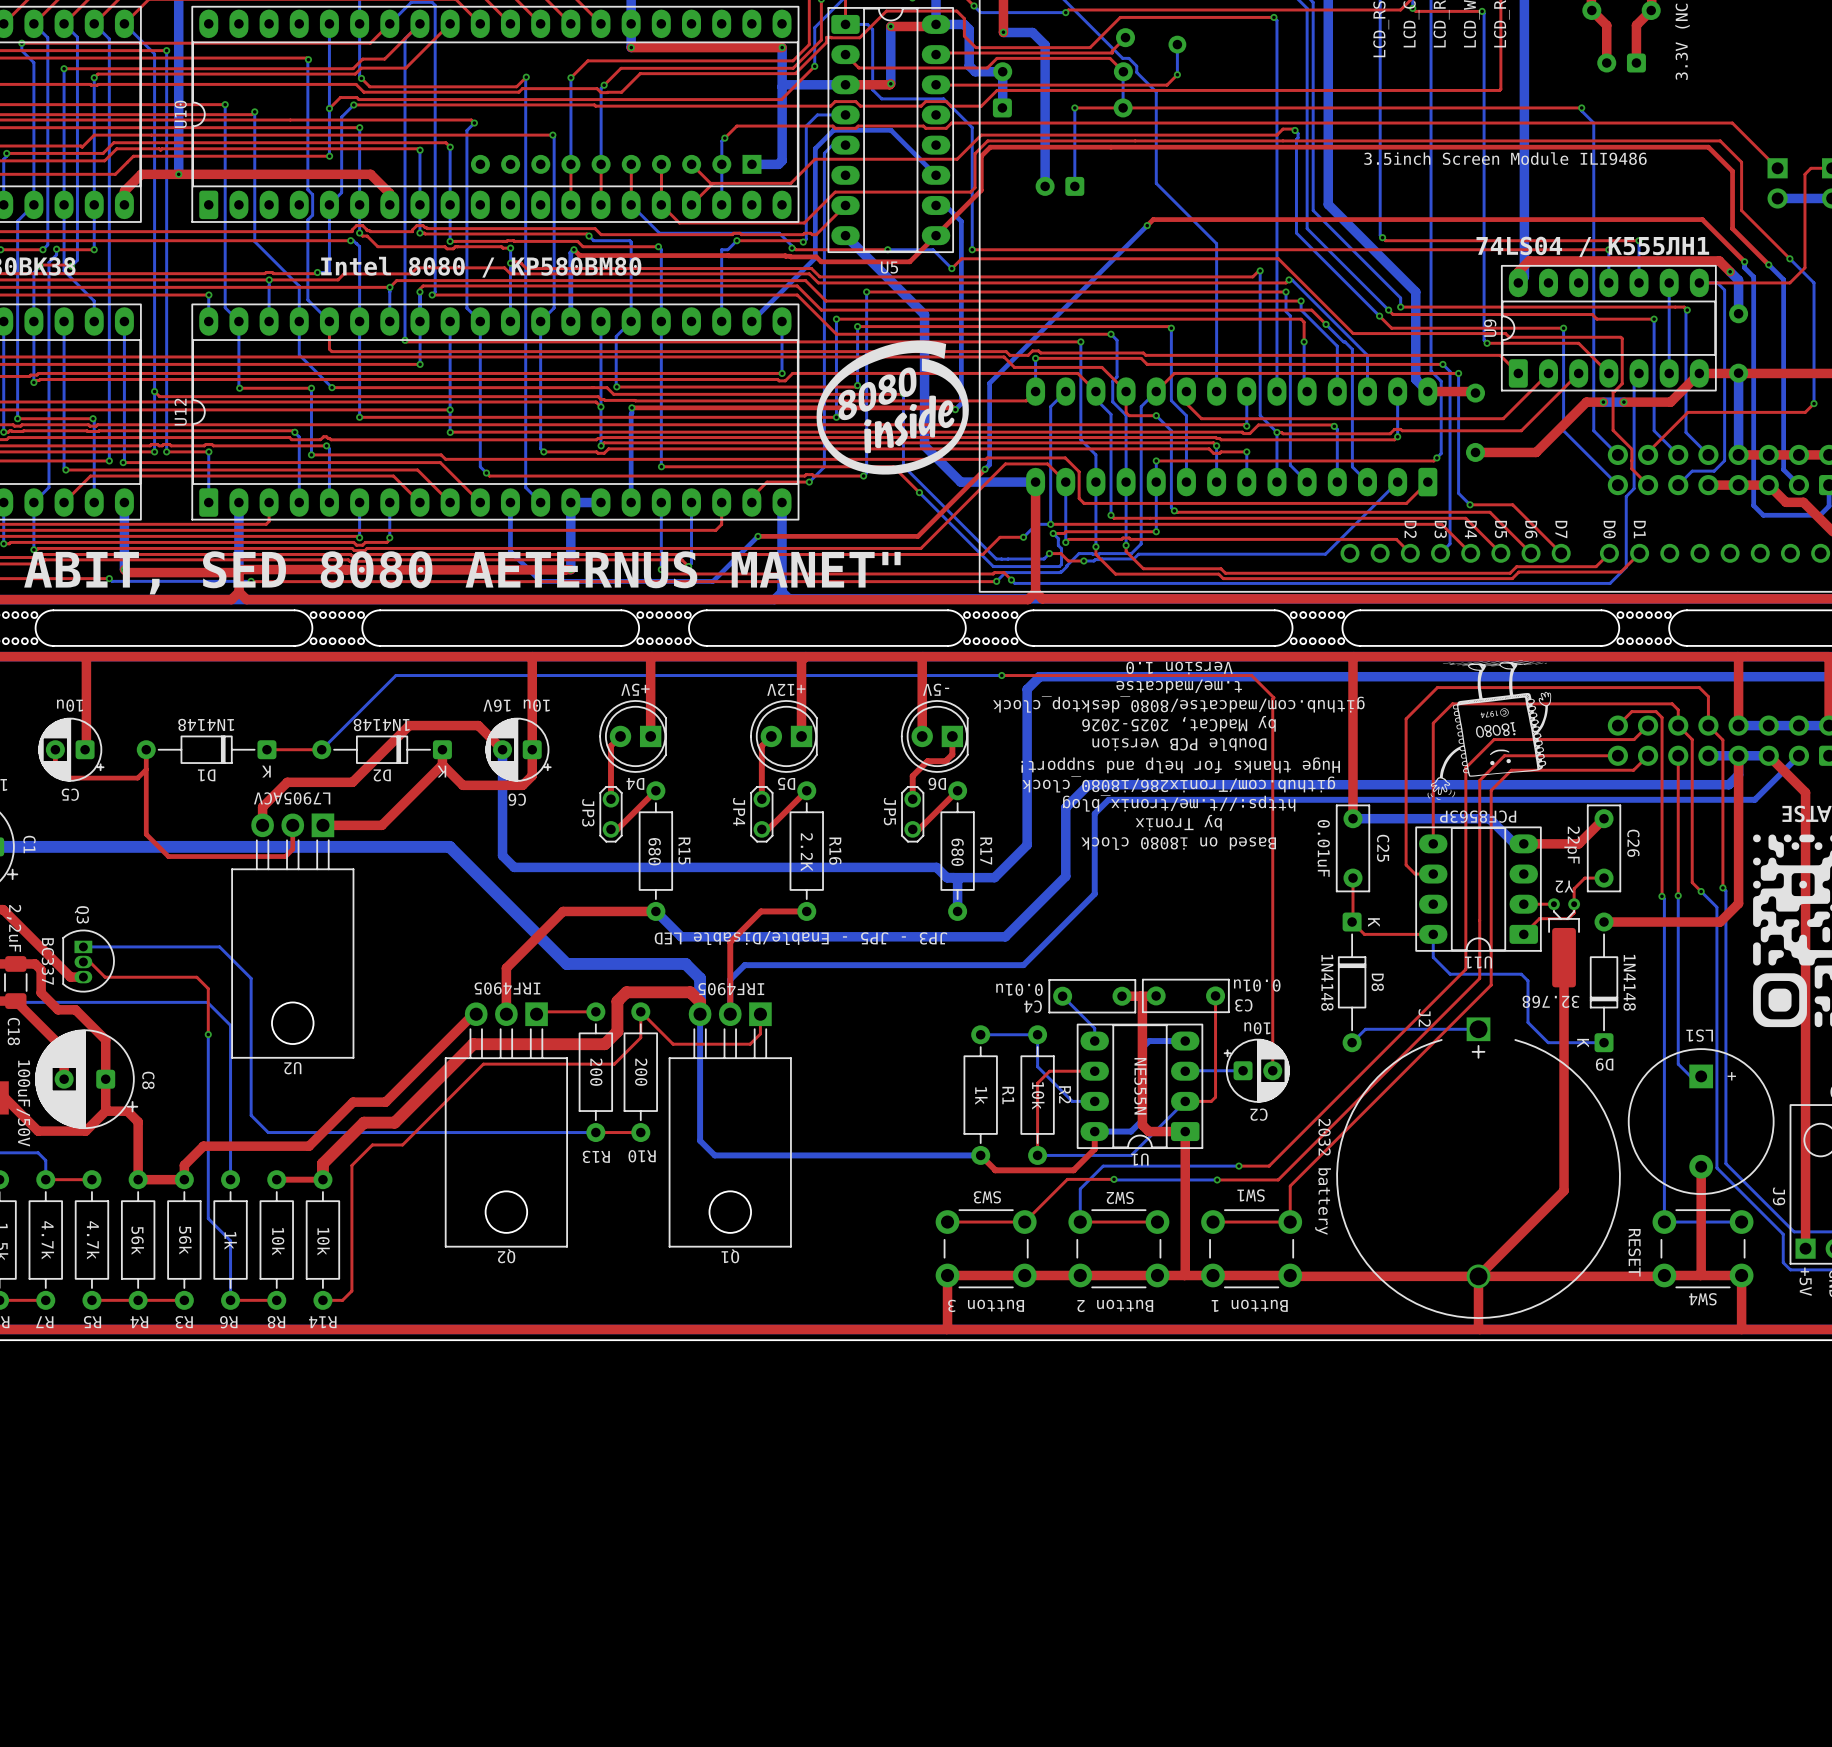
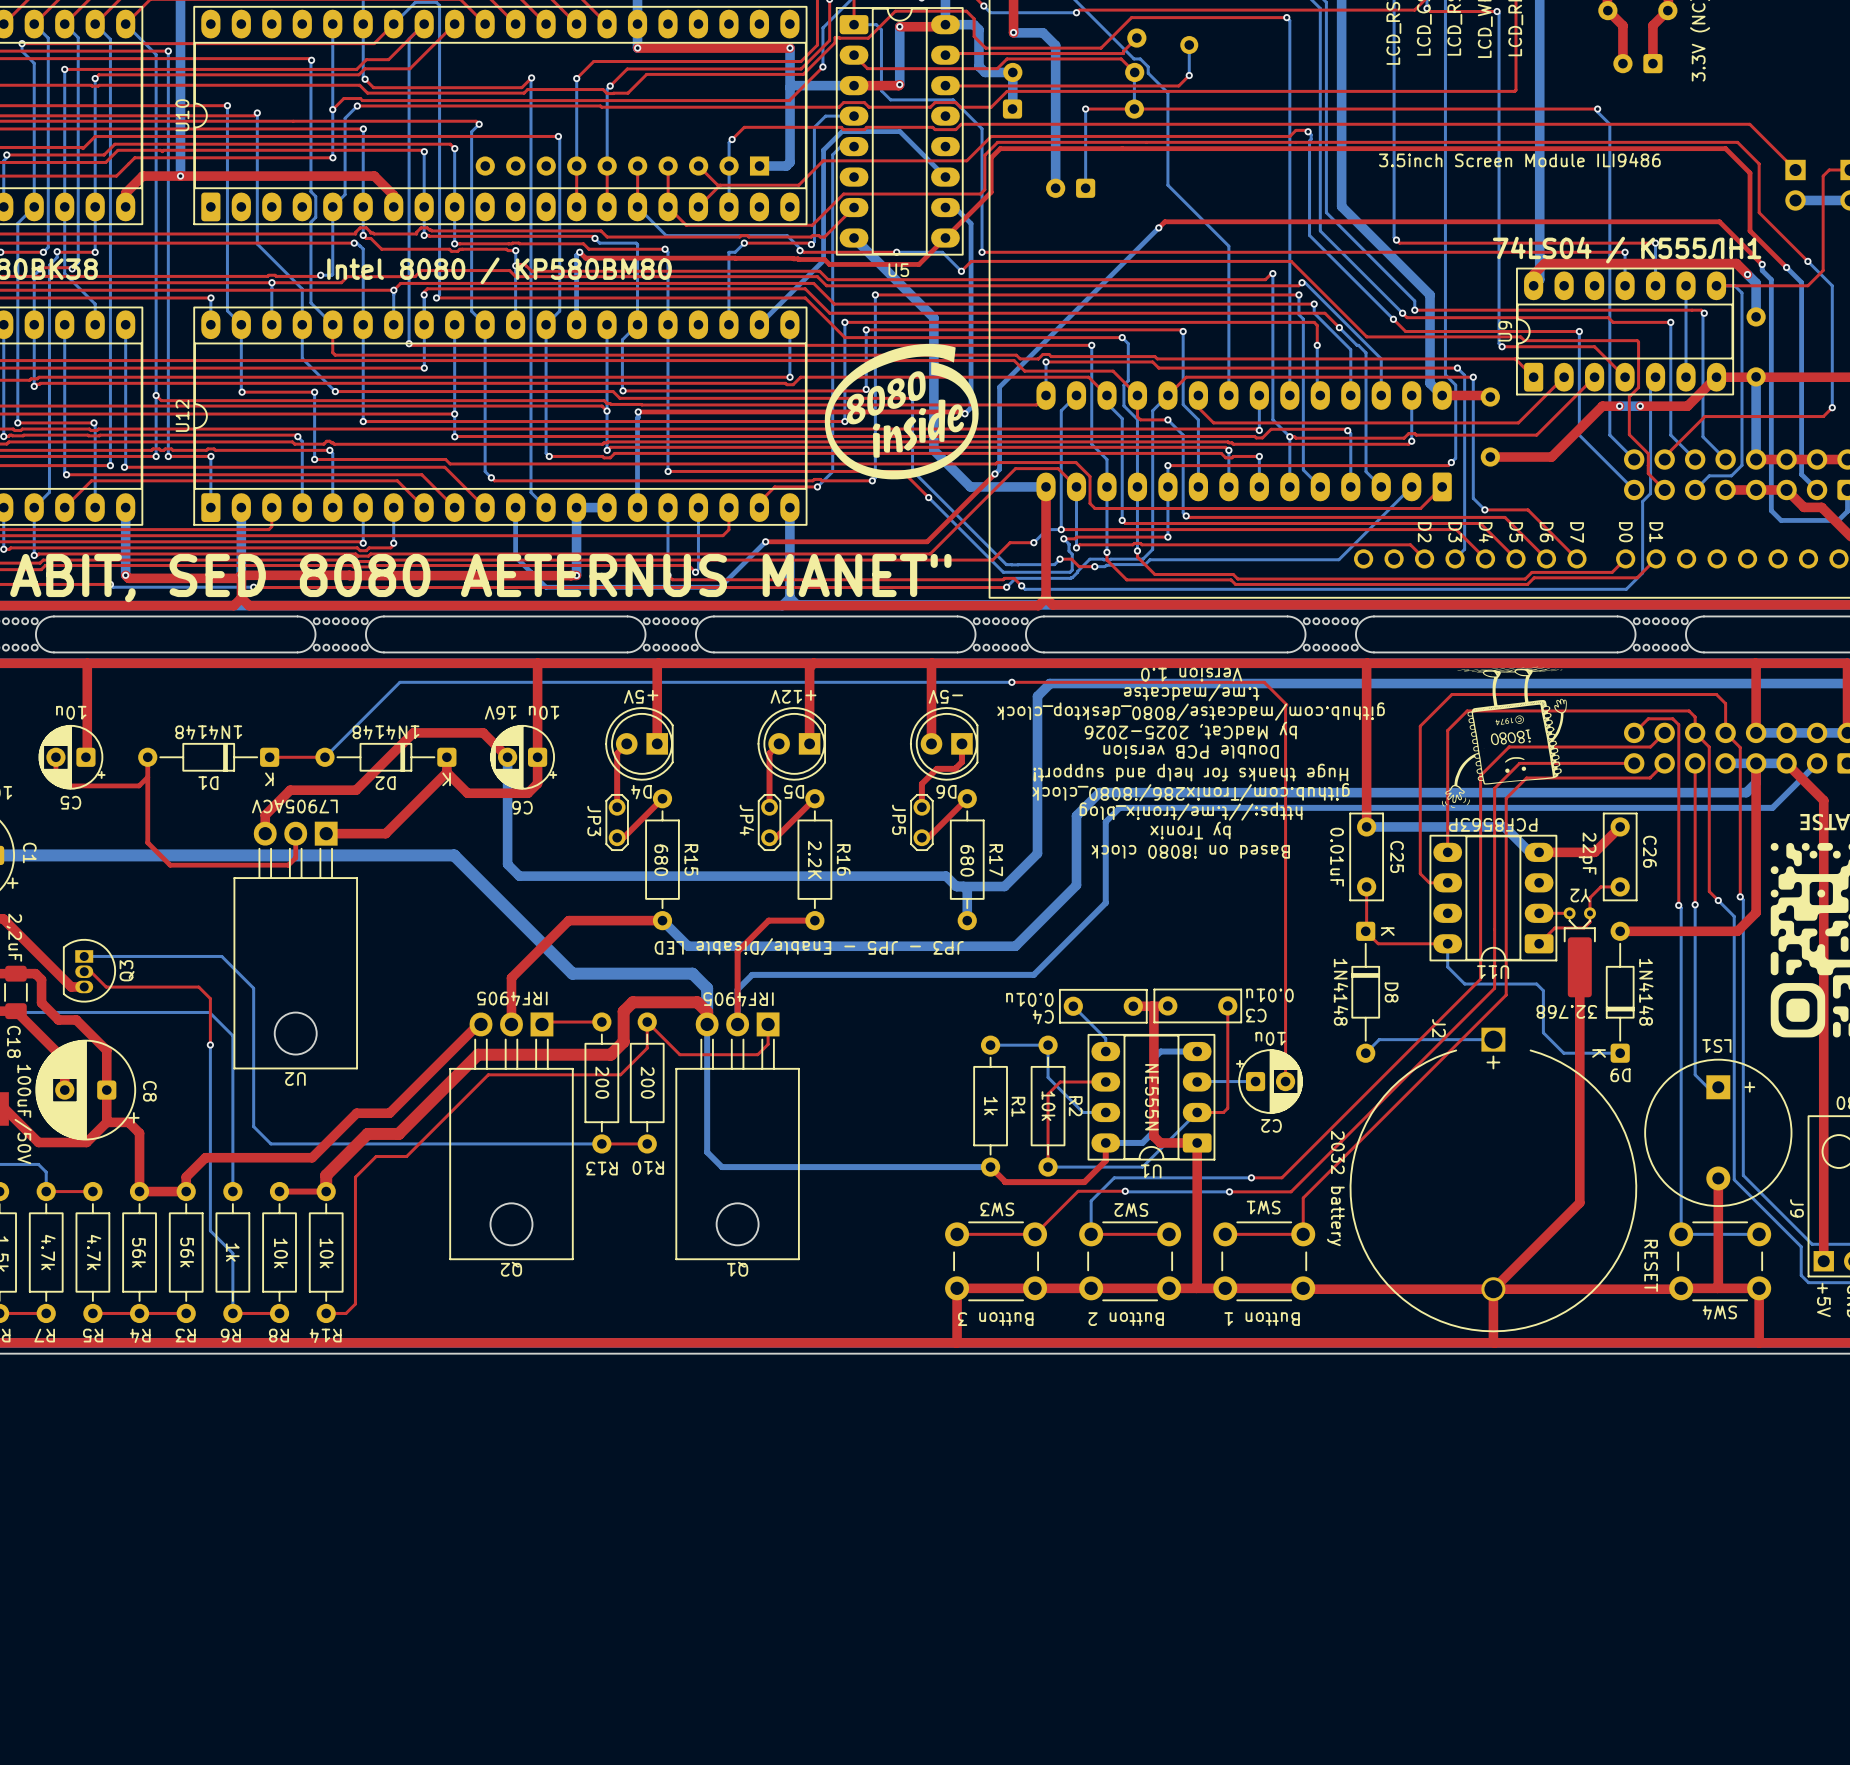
Q3 name rotation: 0° (81, 914) -> 180° (127, 970)
Q3 name position: Q3 (81, 914) -> Q3 (127, 970)
Q3 value: BC337 (47, 961) -> none

